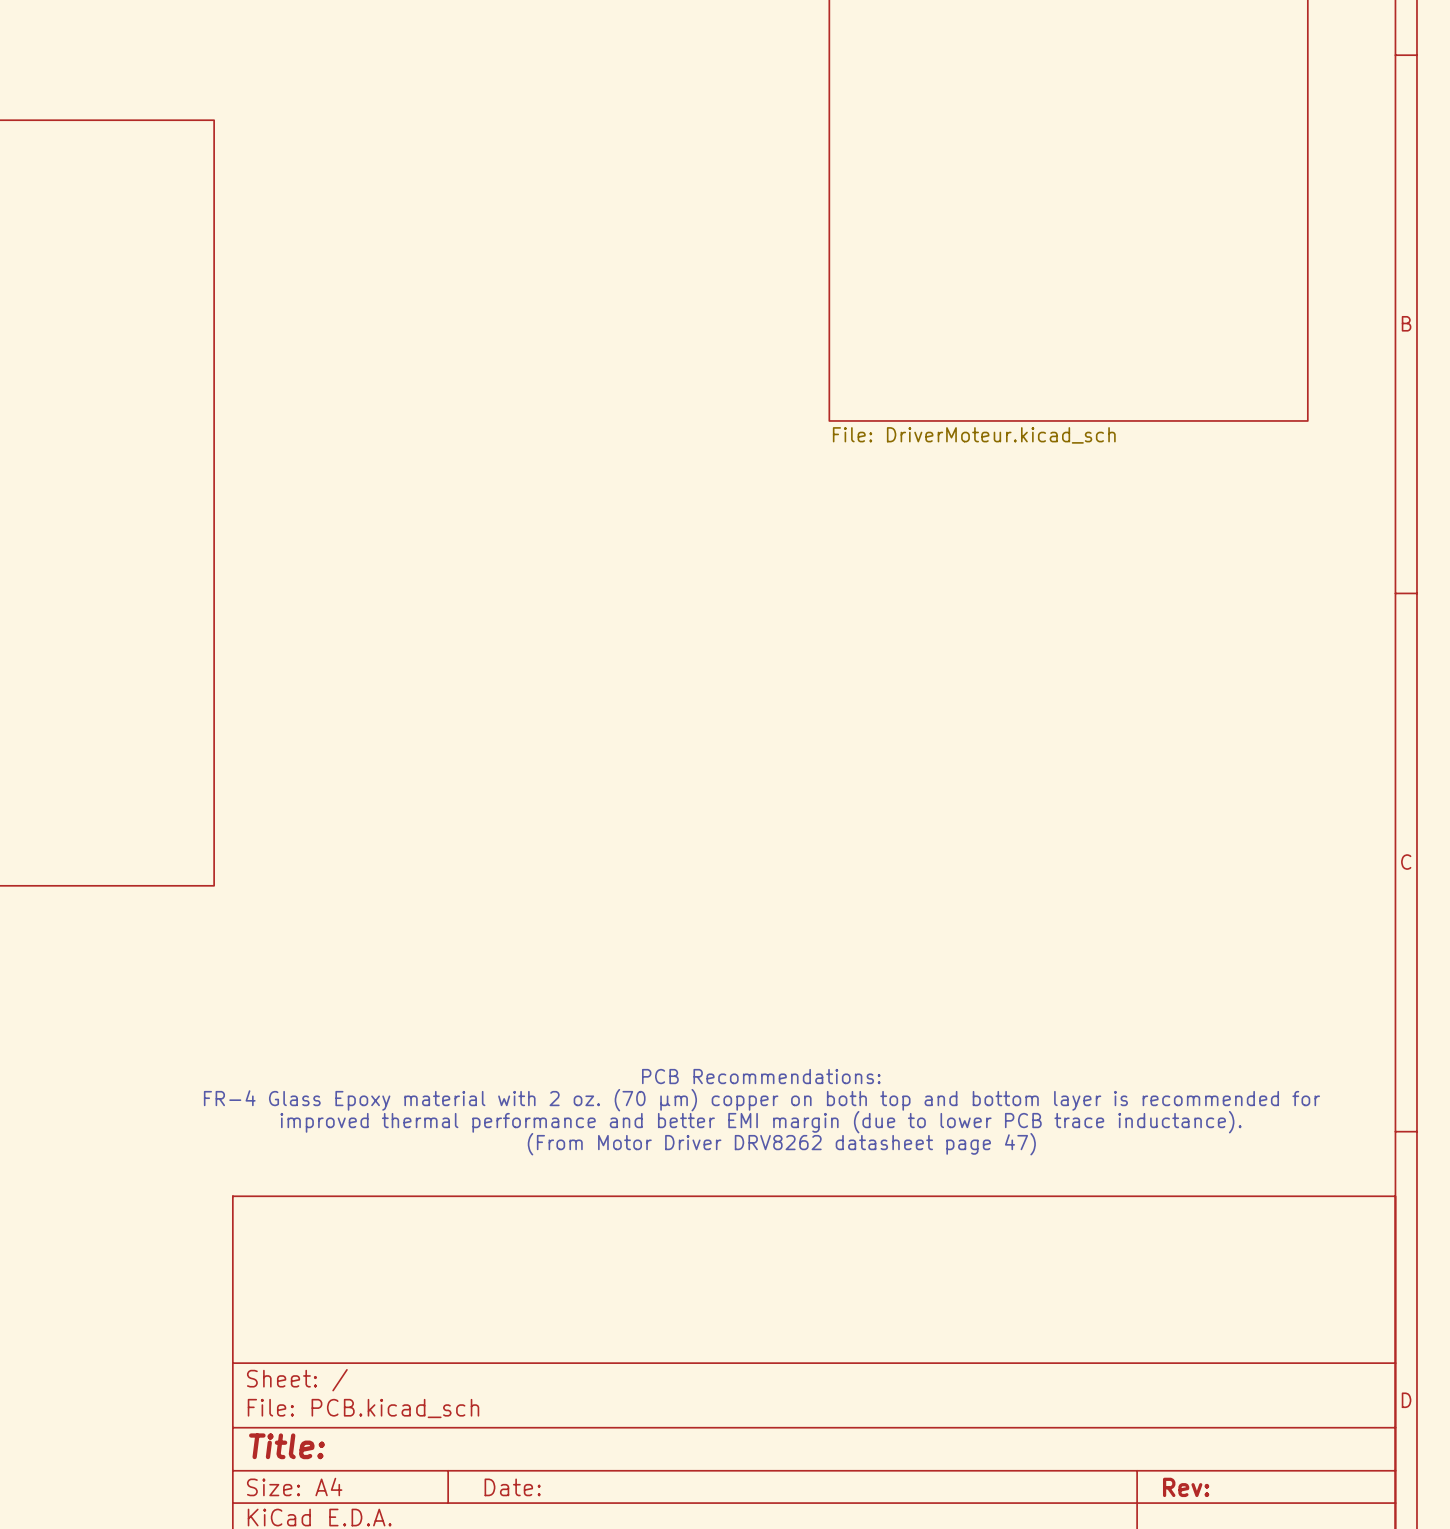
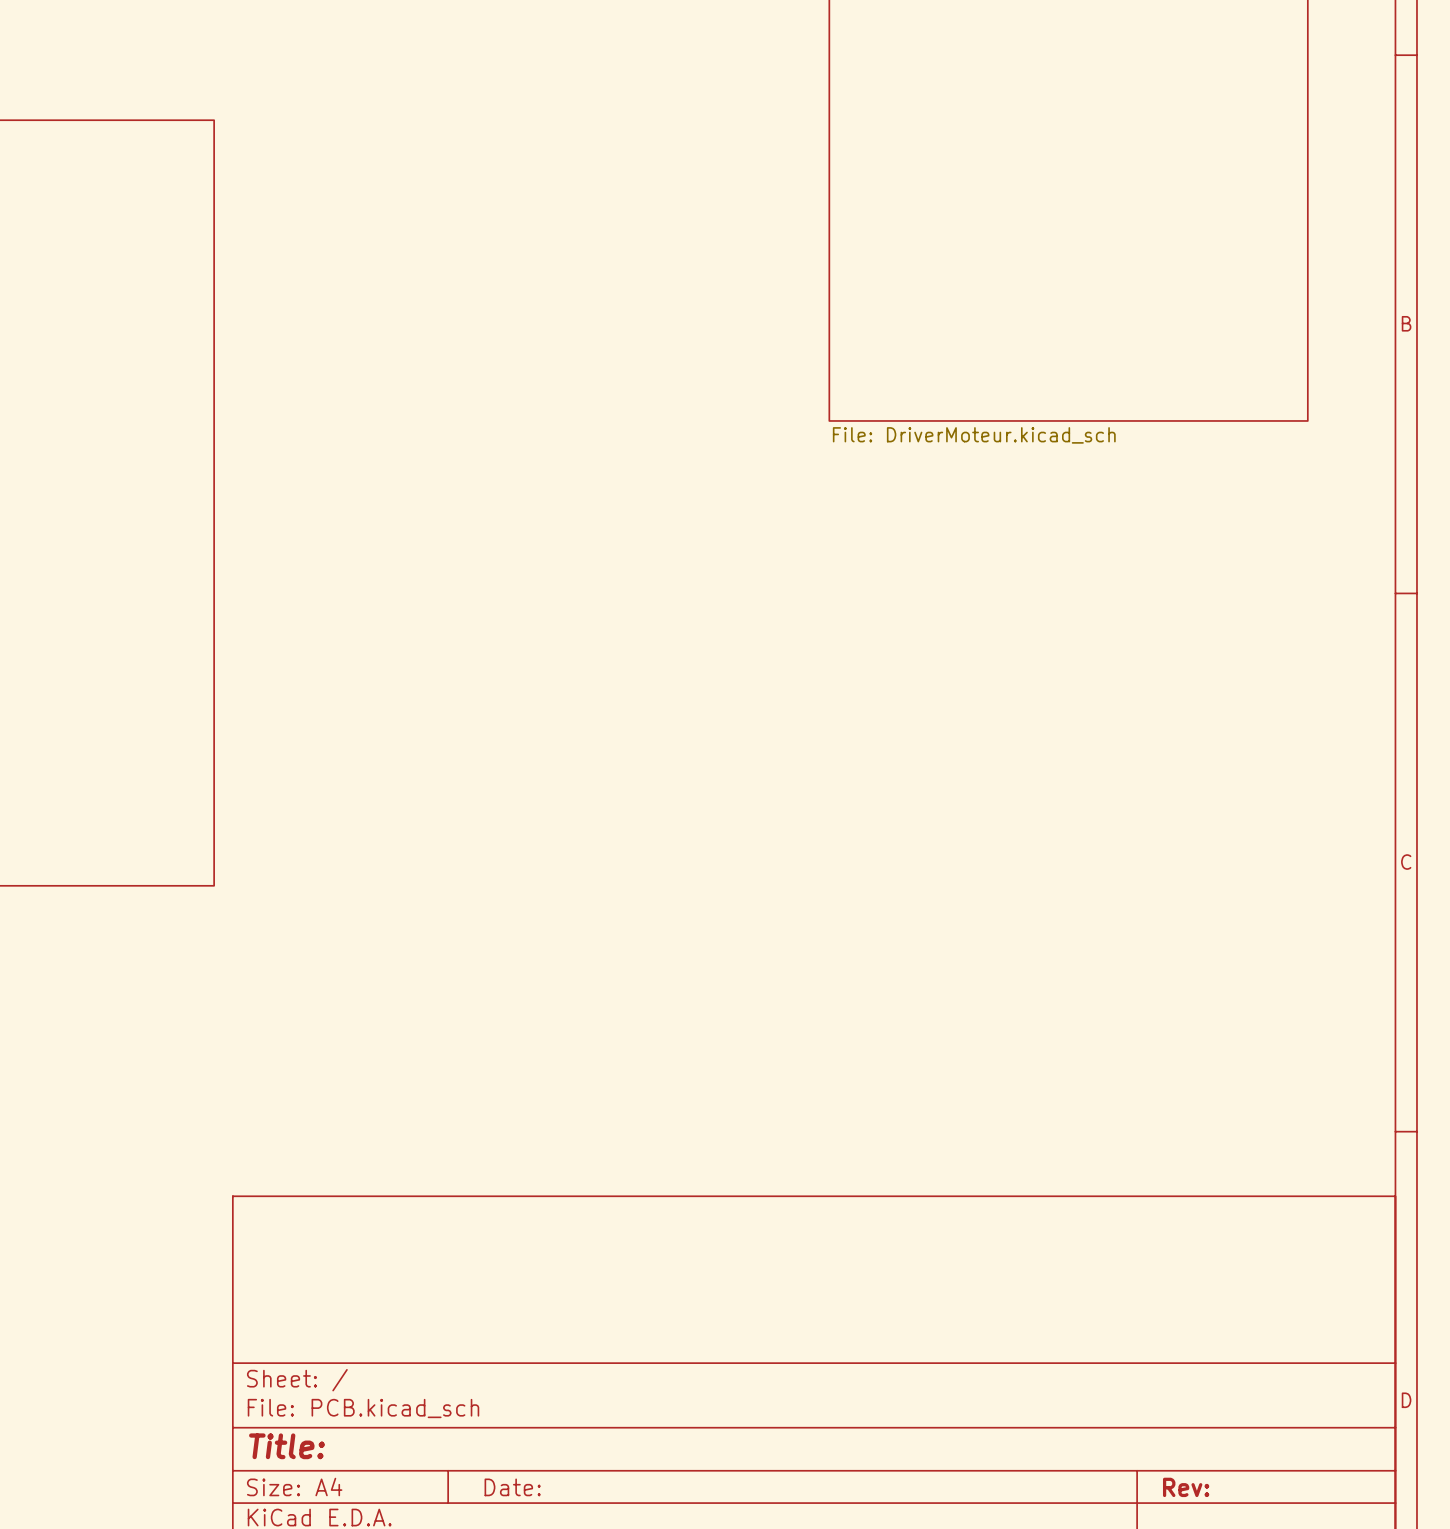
text: PCB Recommendations: (761, 1076) -> none
text: FR-4 Glass Epoxy material with 2 oz. (70 μm) copper on both top and bottom layer is recommended for (761, 1100) -> none
text: improved thermal performance and better EMI margin (due to lower PCB trace inductance). (760, 1122) -> none
text: (From Motor Driver DRV8262 datasheet page 47) (781, 1144) -> none

